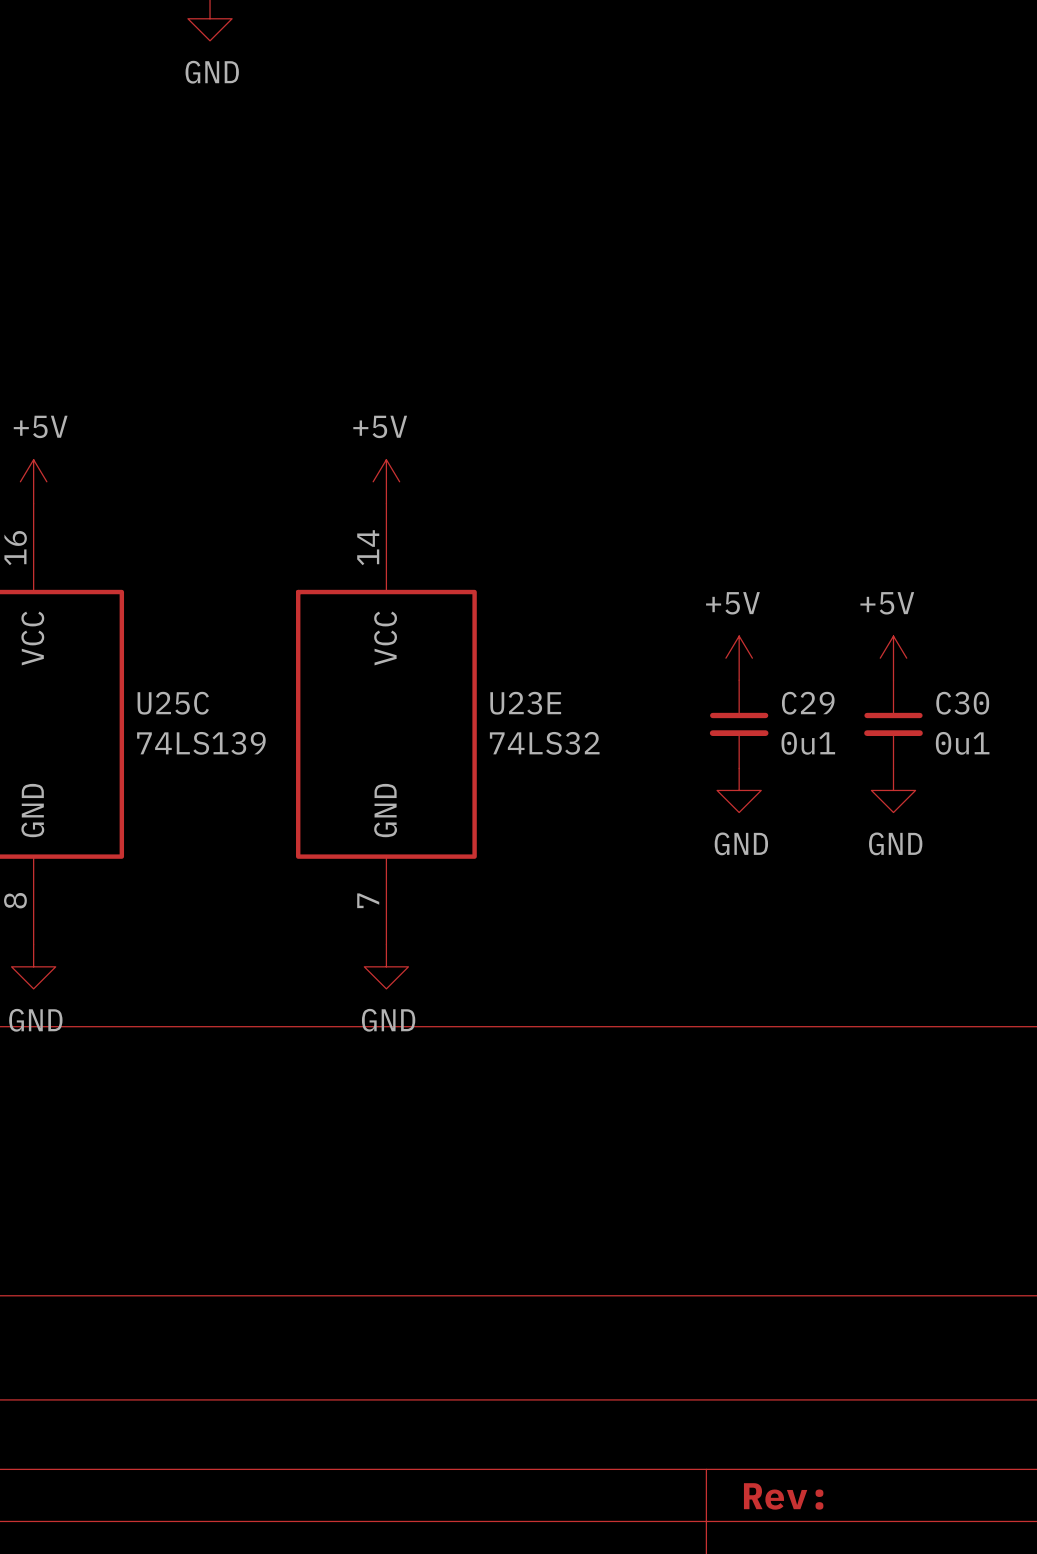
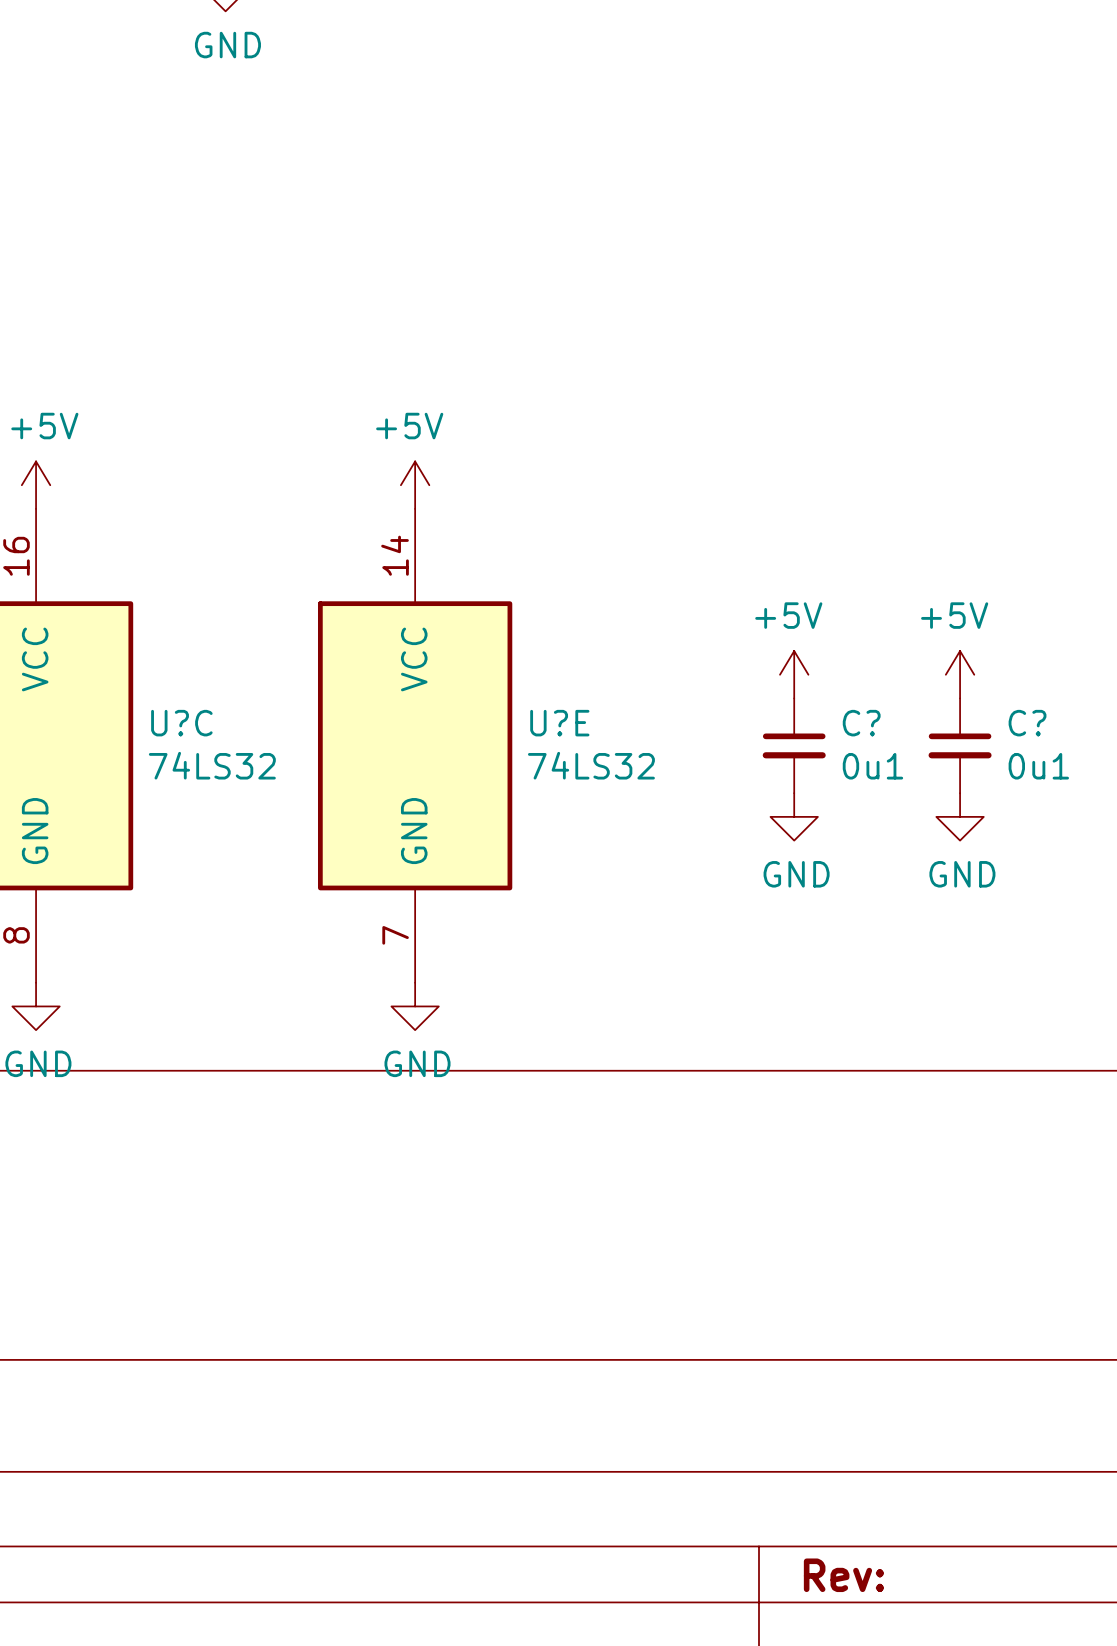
U25C name: U25C (173, 703) -> U?C (181, 723)
U23E name: U23E (525, 703) -> U?E (559, 723)
C29 name: C29 (808, 703) -> C? (861, 723)
C30 name: C30 (962, 703) -> C? (1027, 723)
U25C value: 74LS139 (201, 743) -> 74LS32 (212, 765)

